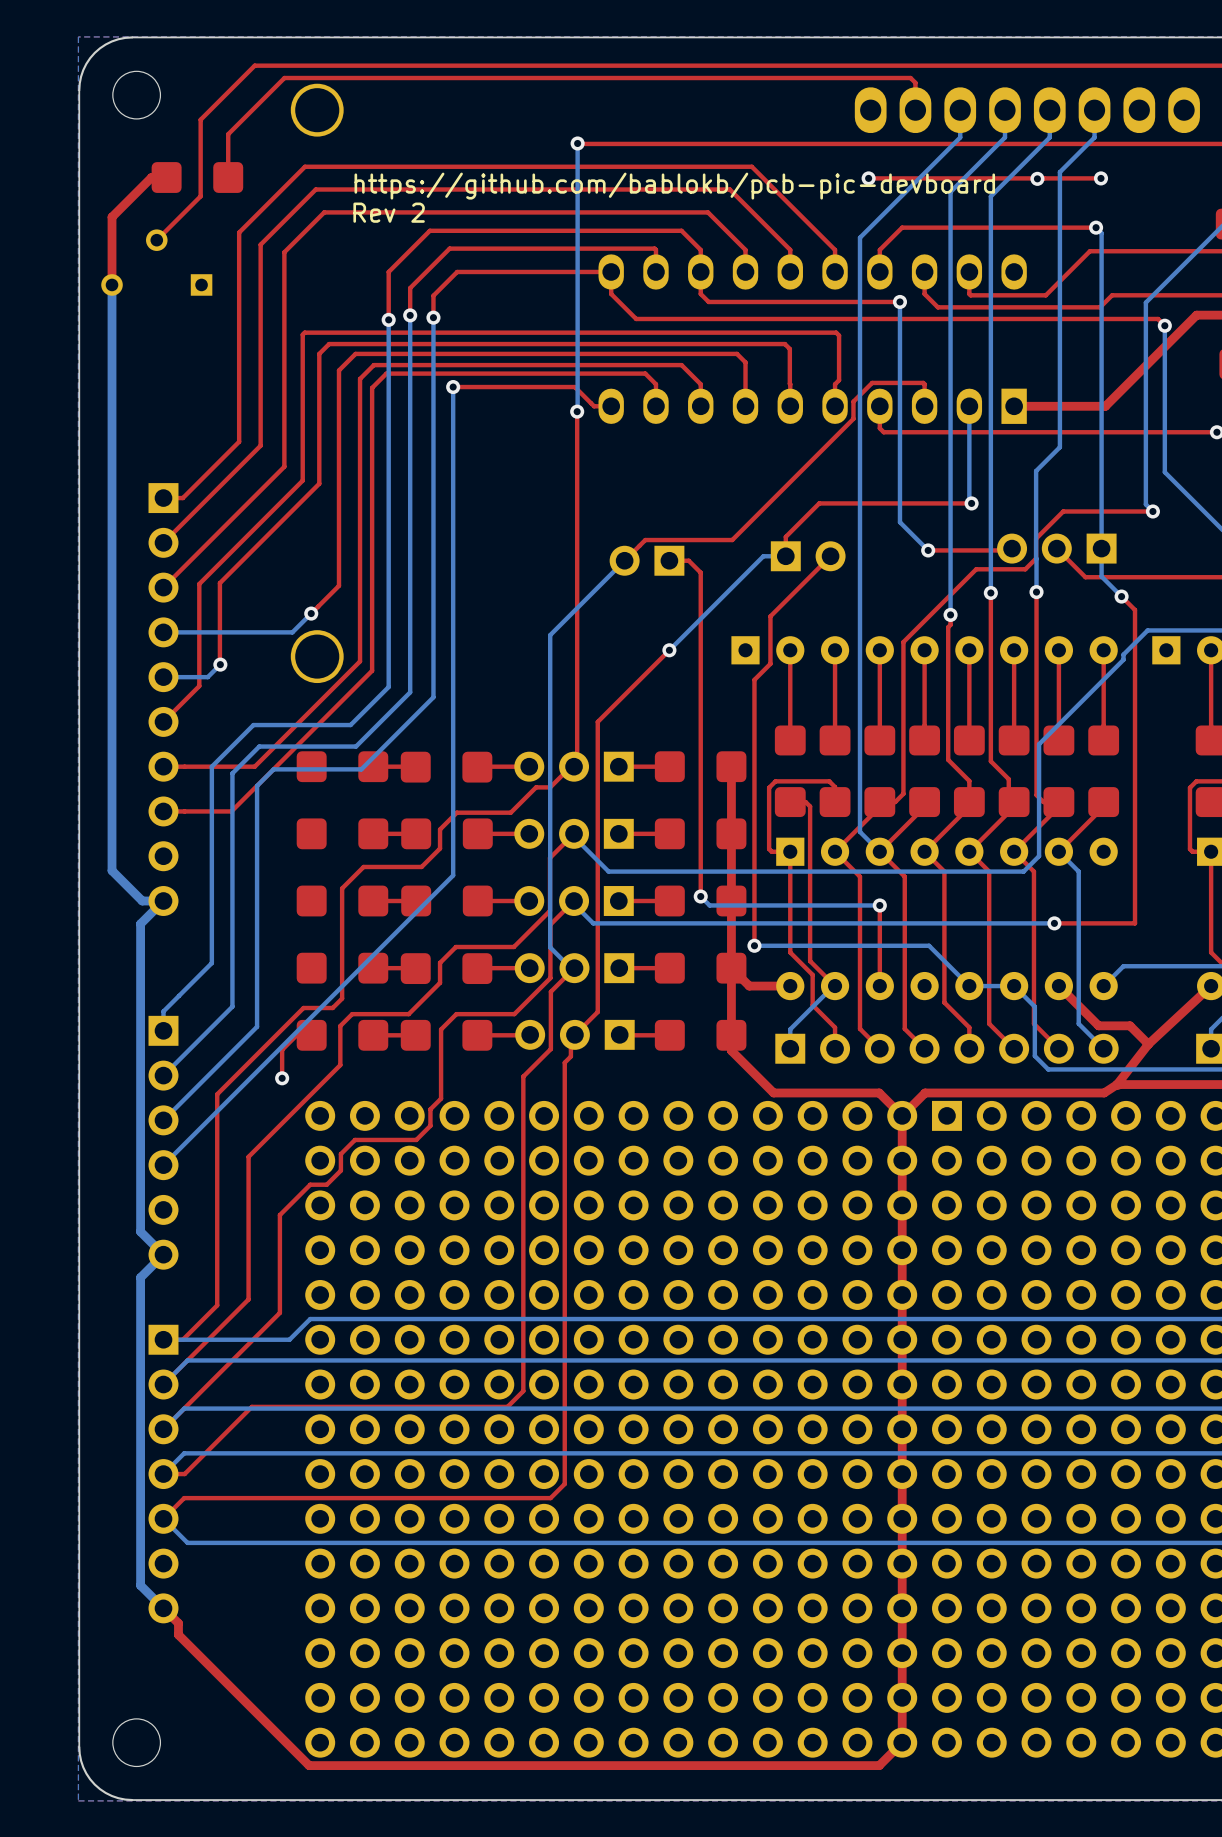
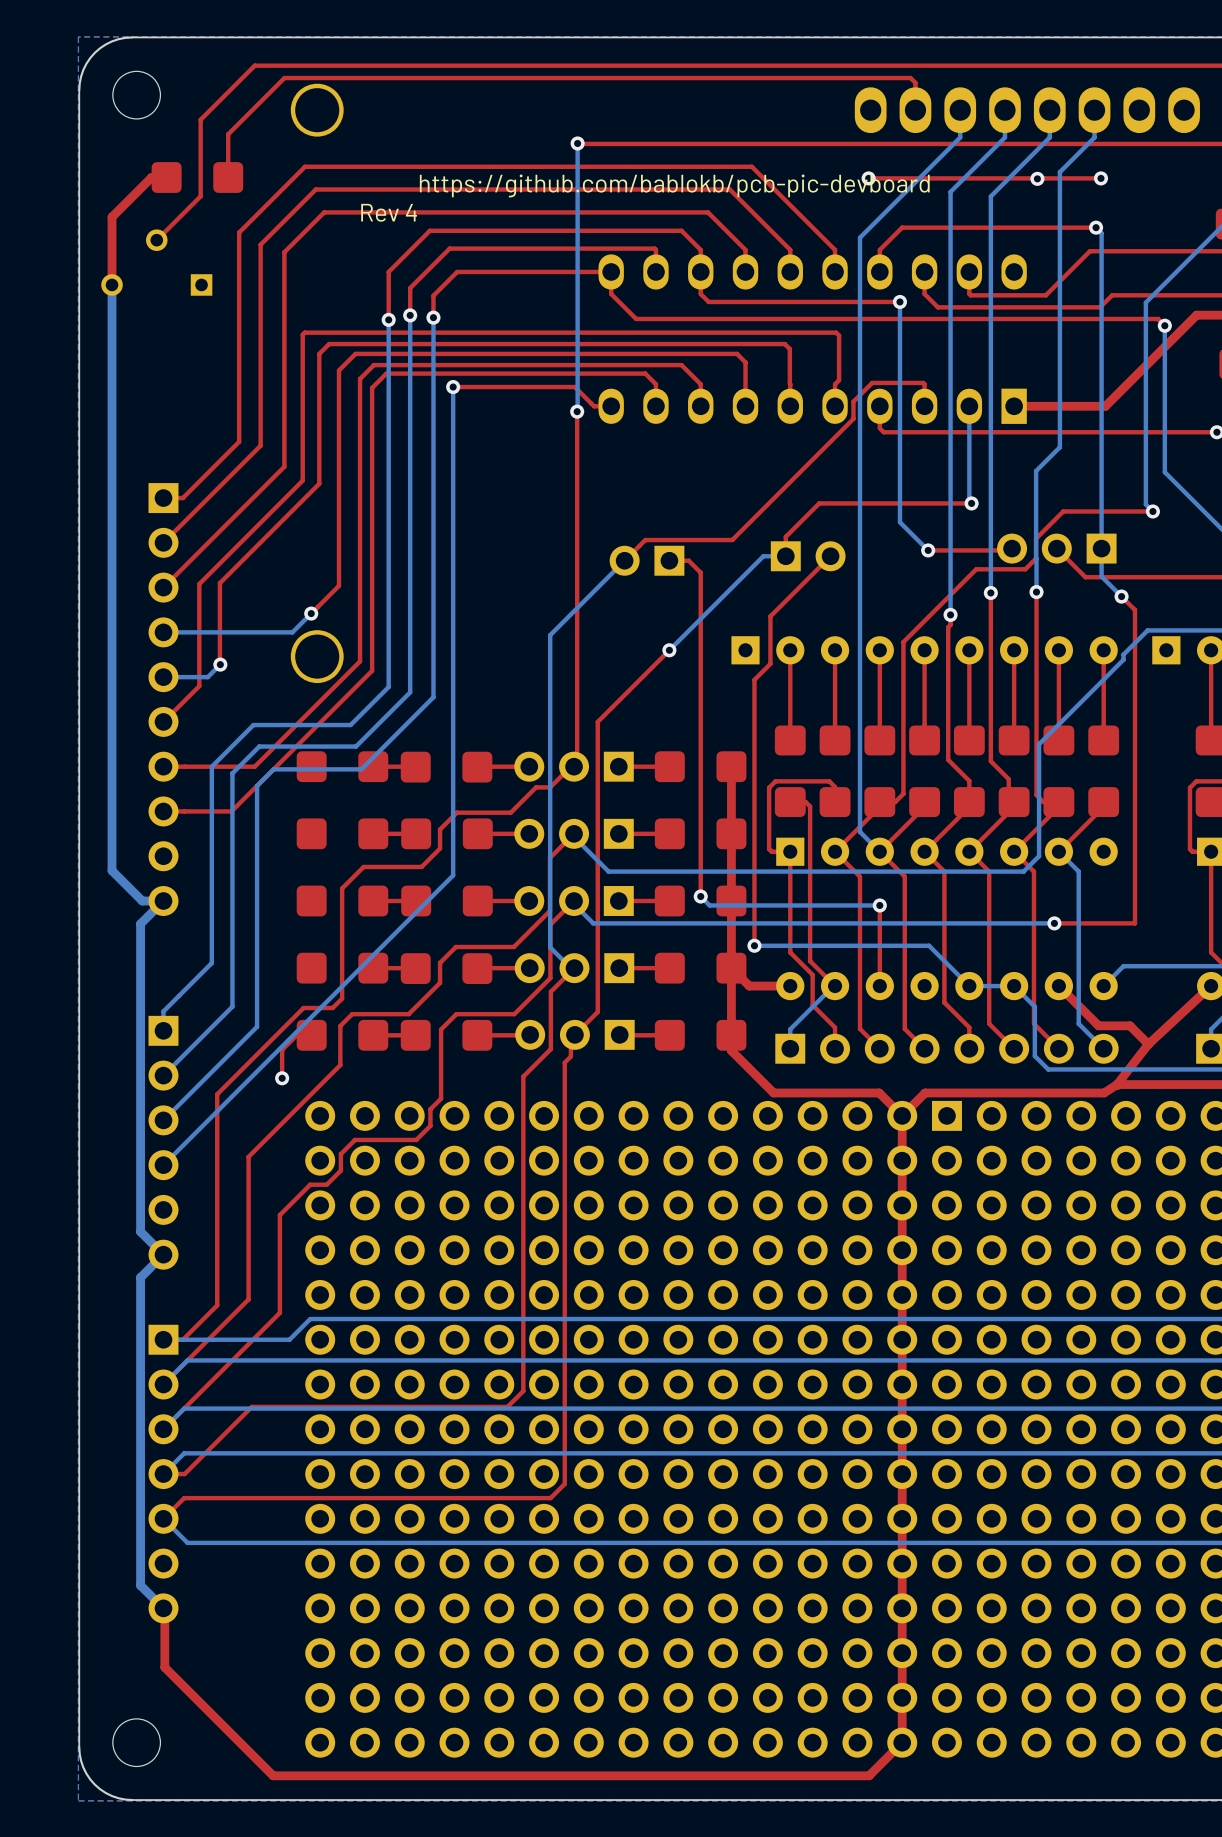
text: Rev 2 (389, 212) -> Rev 4 (389, 212)
top track: (164, 1609) (178, 1623) (178, 1634) (309, 1765) (879, 1765) -> (164, 1609) (164, 1667) (273, 1775) (869, 1775) (879, 1765)

